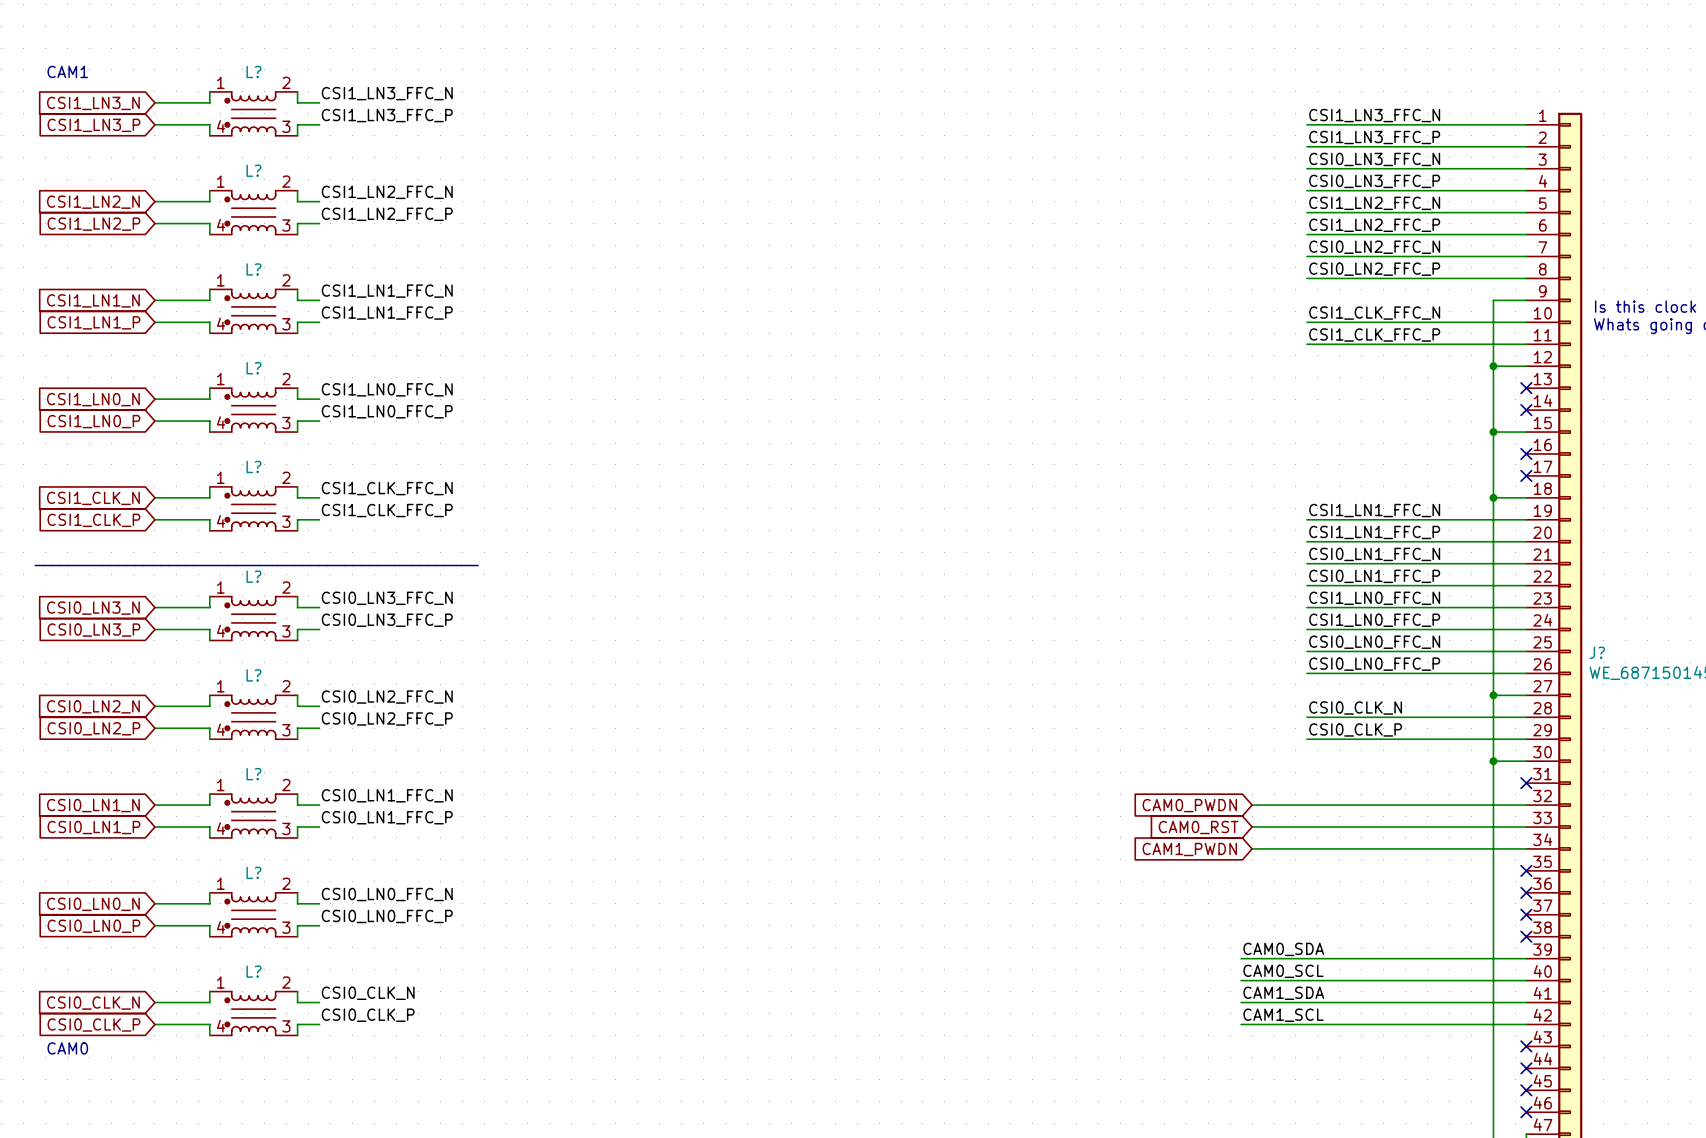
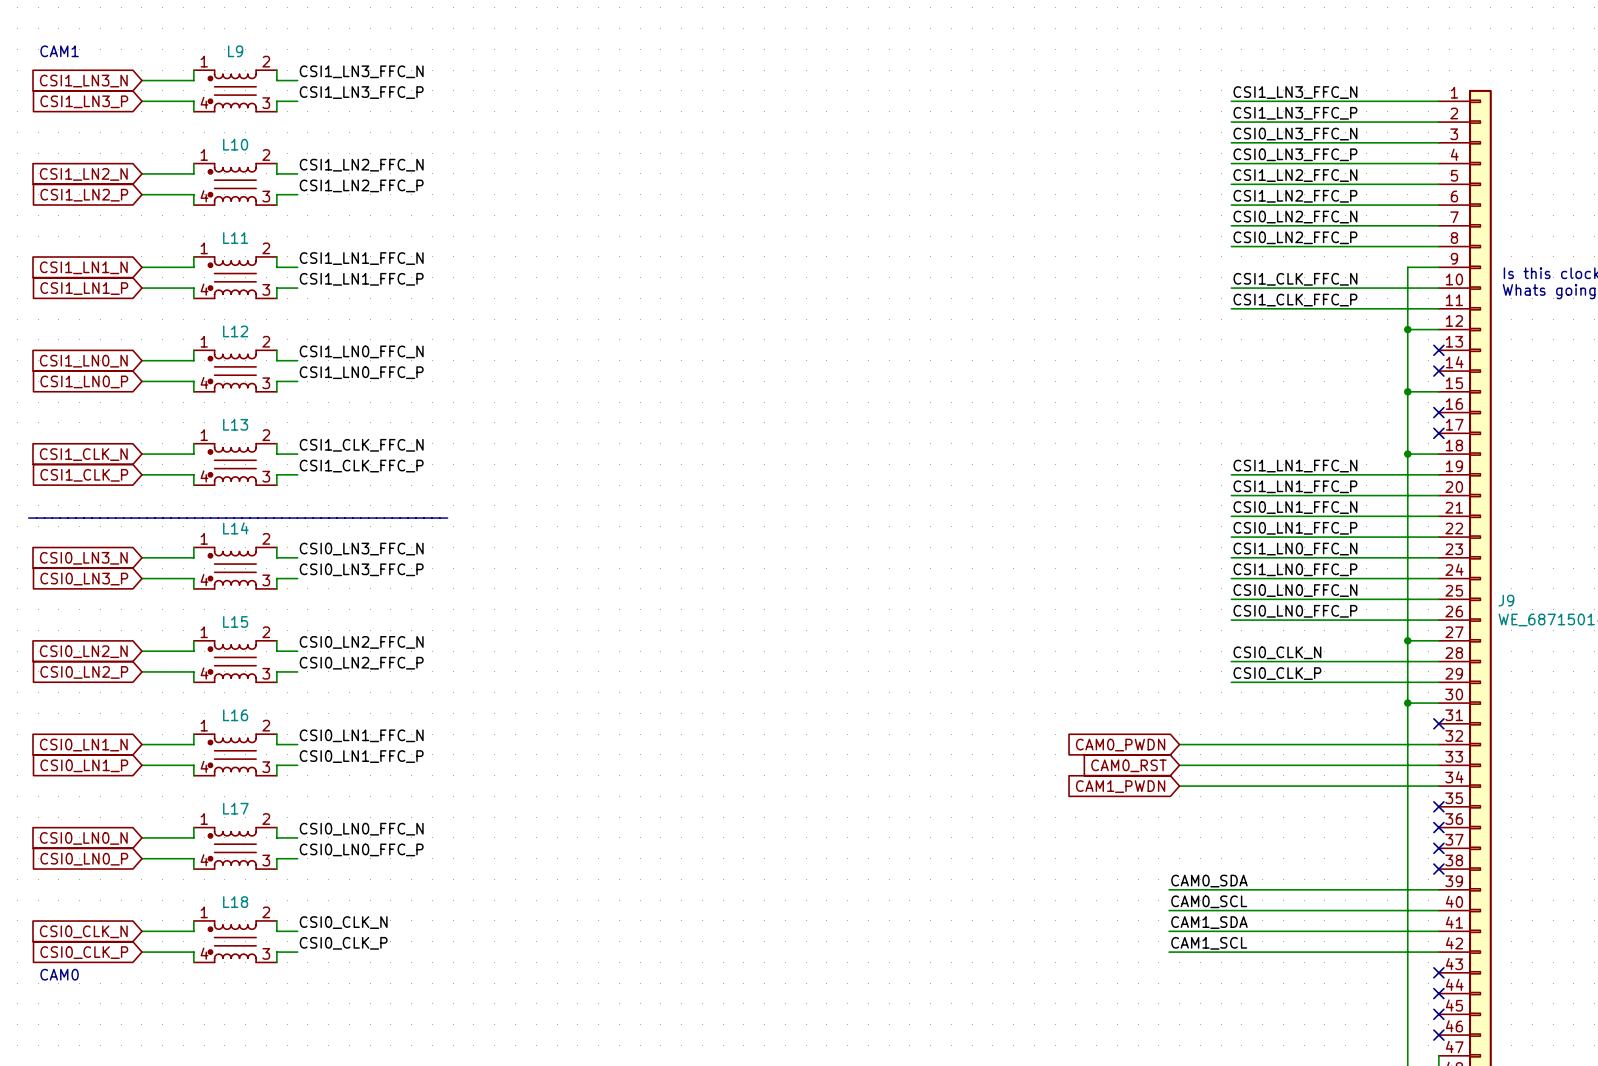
L? name: L? (253, 71) -> L9 (235, 51)
L? name: L? (253, 170) -> L10 (235, 144)
L? name: L? (253, 269) -> L11 (235, 238)
L? name: L? (253, 368) -> L12 (235, 331)
L? name: L? (253, 466) -> L13 (235, 424)
L? name: L? (253, 576) -> L14 (235, 528)
J? name: J? (1597, 652) -> J9 (1506, 600)
L? name: L? (253, 675) -> L15 (235, 621)
L? name: L? (253, 774) -> L16 (235, 715)
L? name: L? (253, 872) -> L17 (235, 808)
L? name: L? (253, 971) -> L18 (235, 902)

